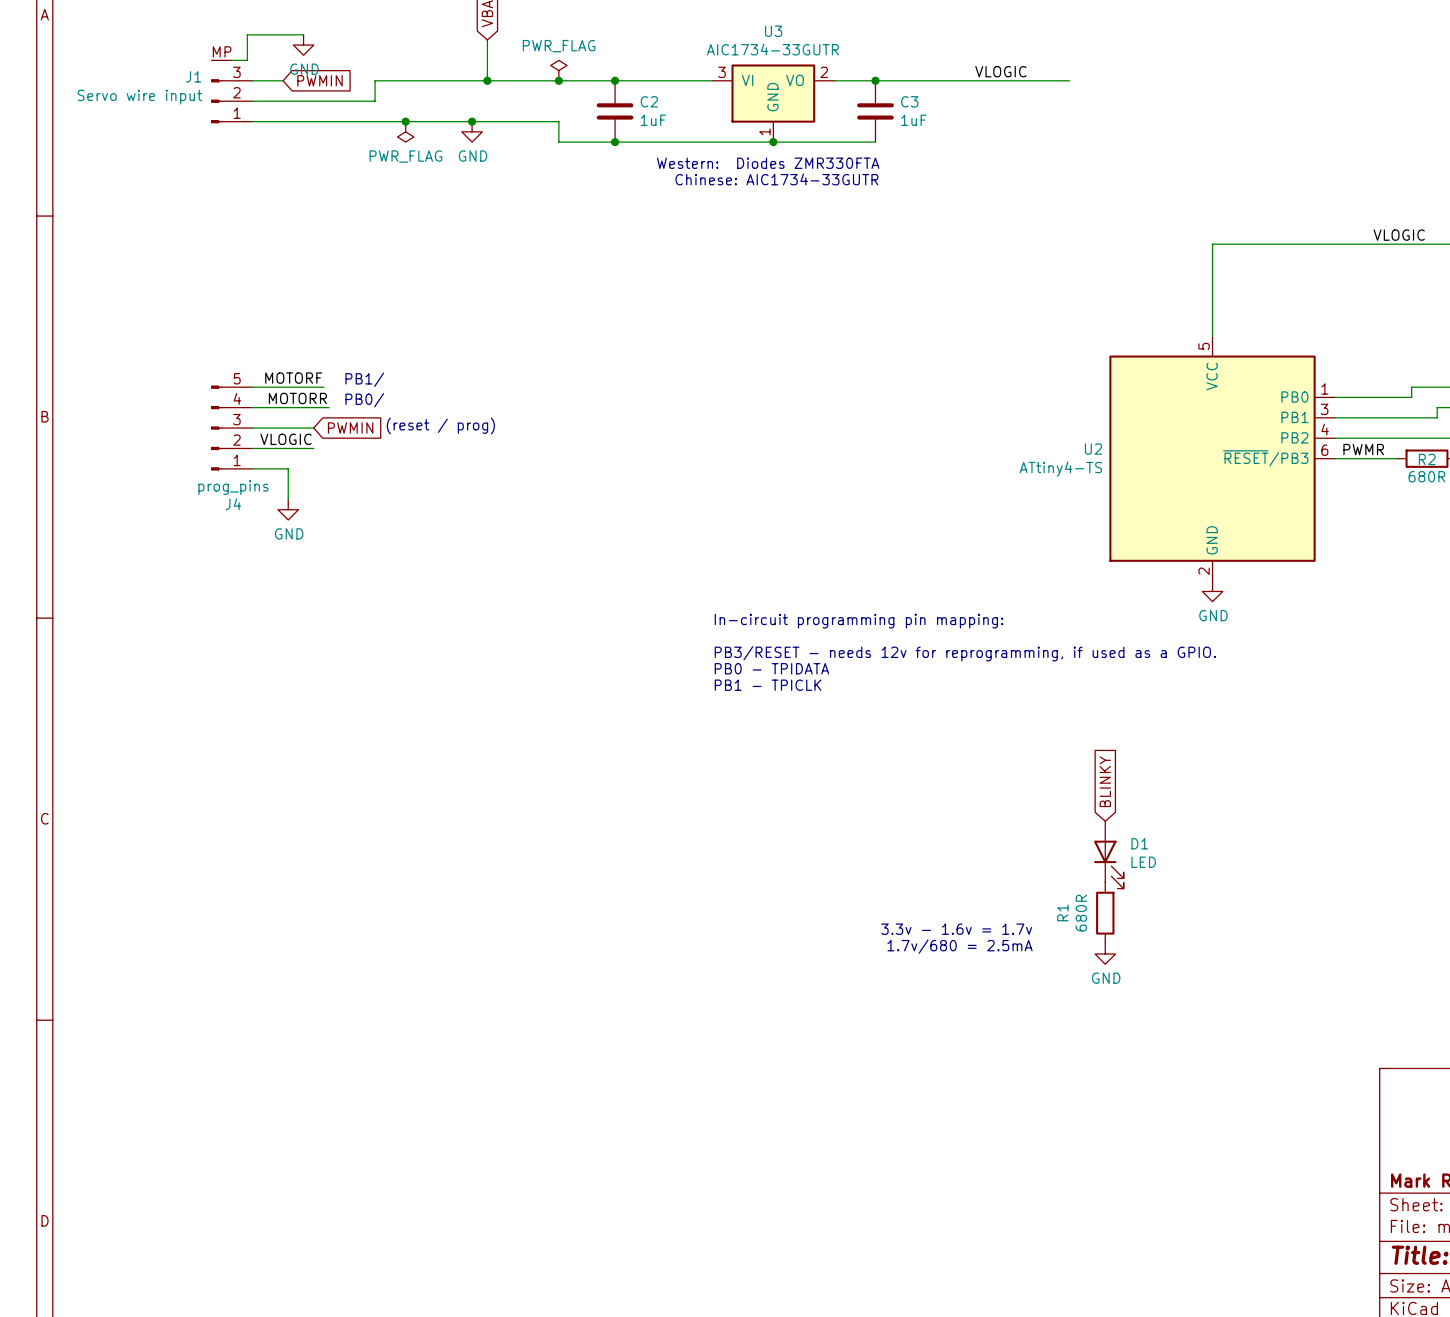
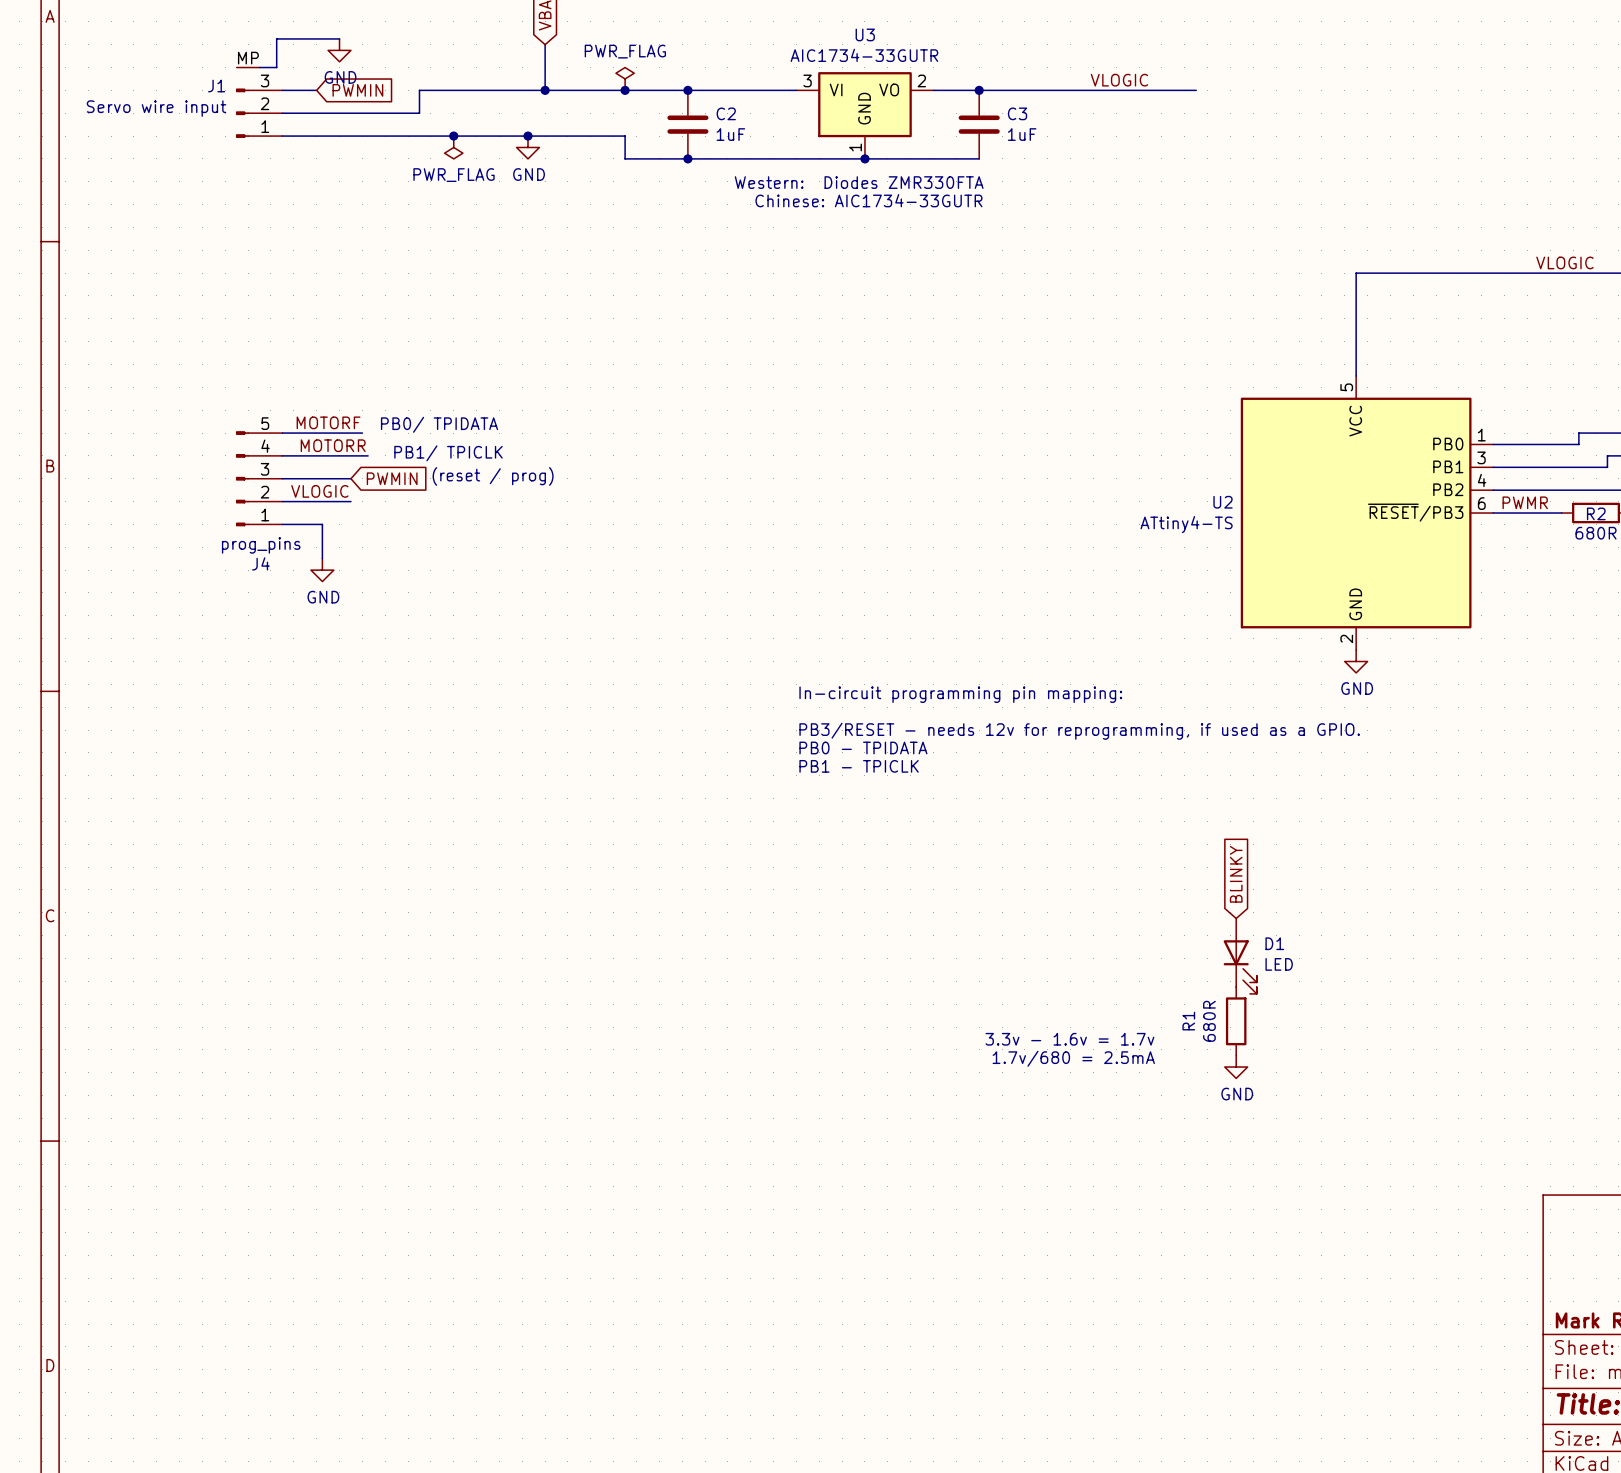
text: PB1/ (364, 379) -> none
text: none -> PB0/ TPIDATA (439, 424)
text: PB0/ (364, 400) -> none
text: none -> PB1/ TPICLK (448, 453)

